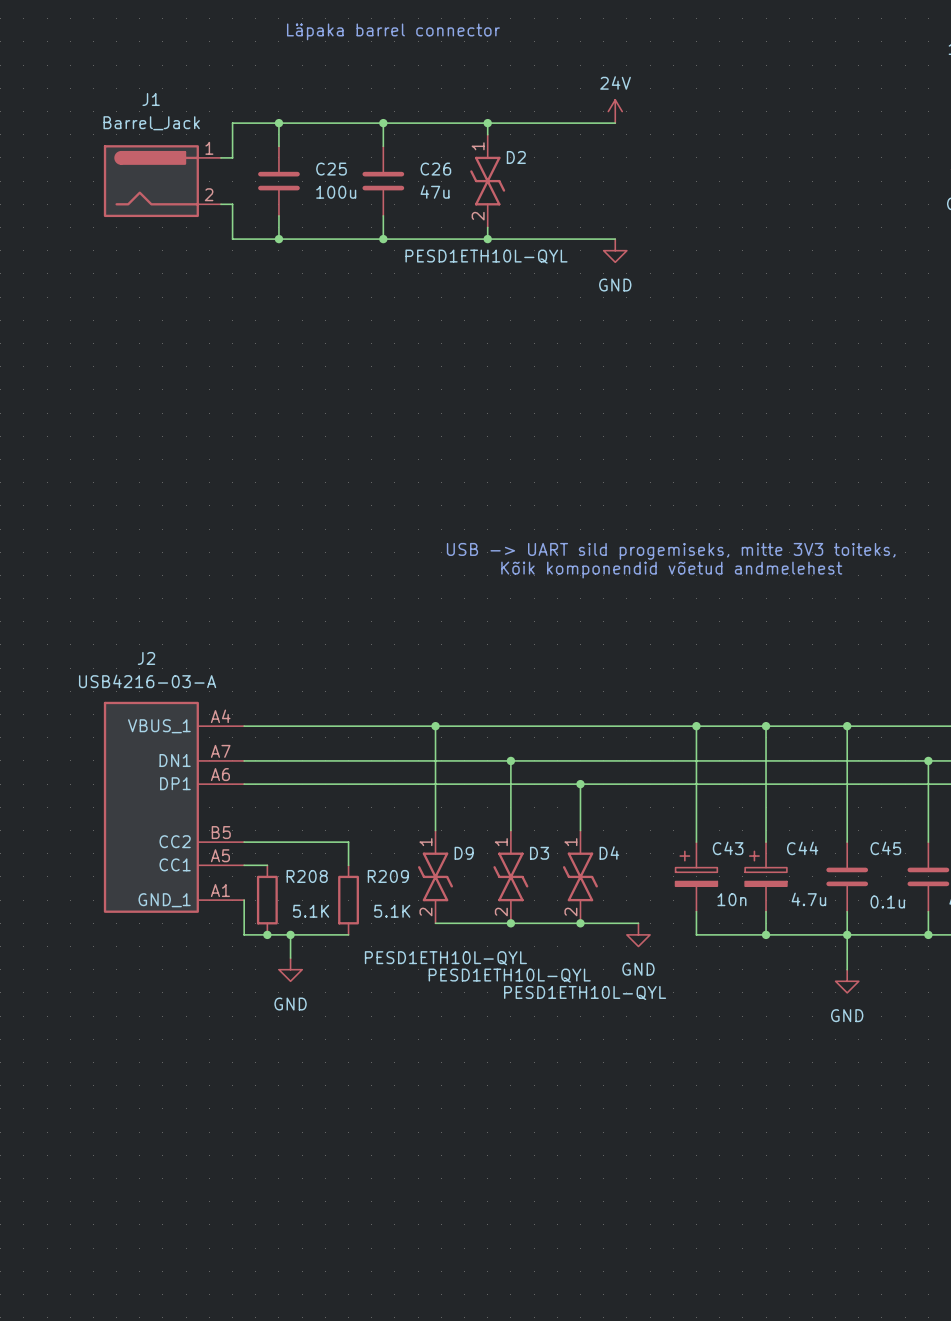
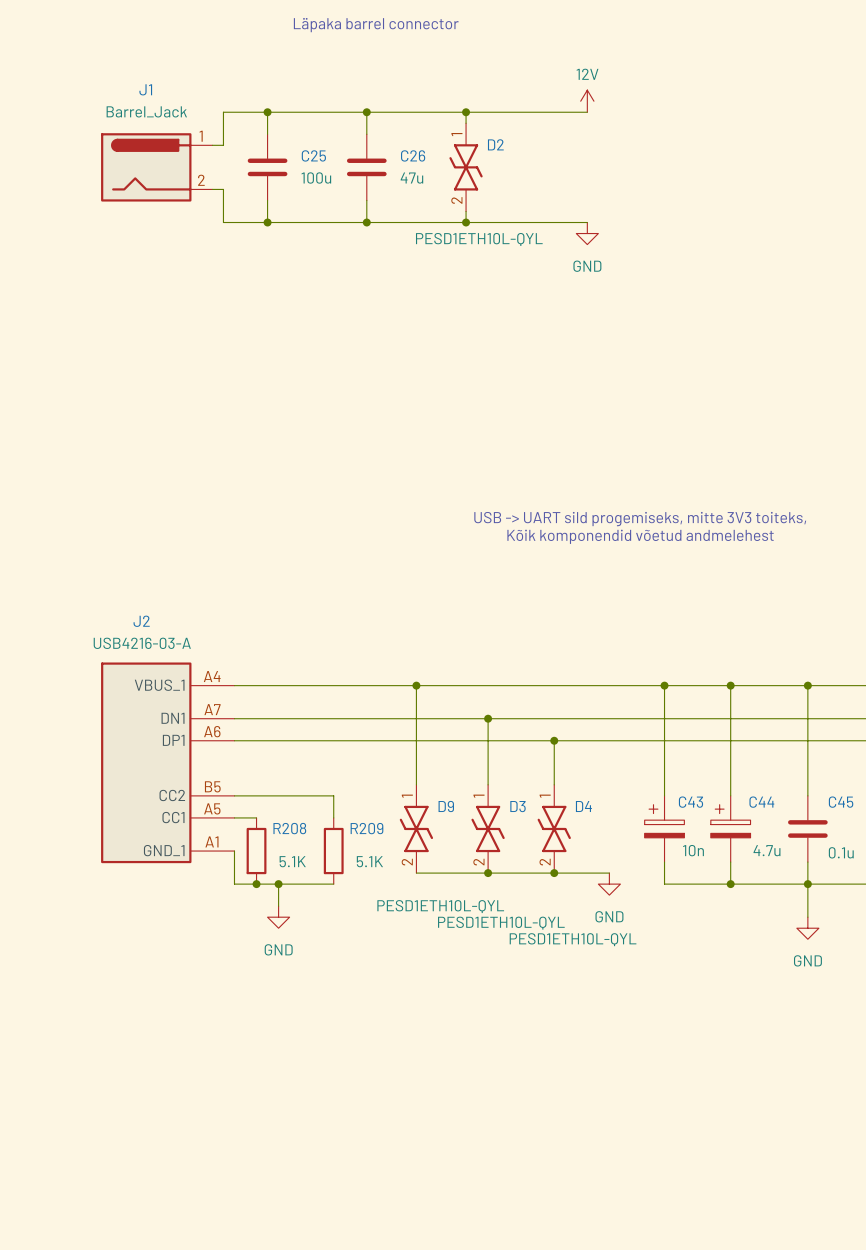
power symbol: 24V (615, 111) -> 12V (587, 101)

